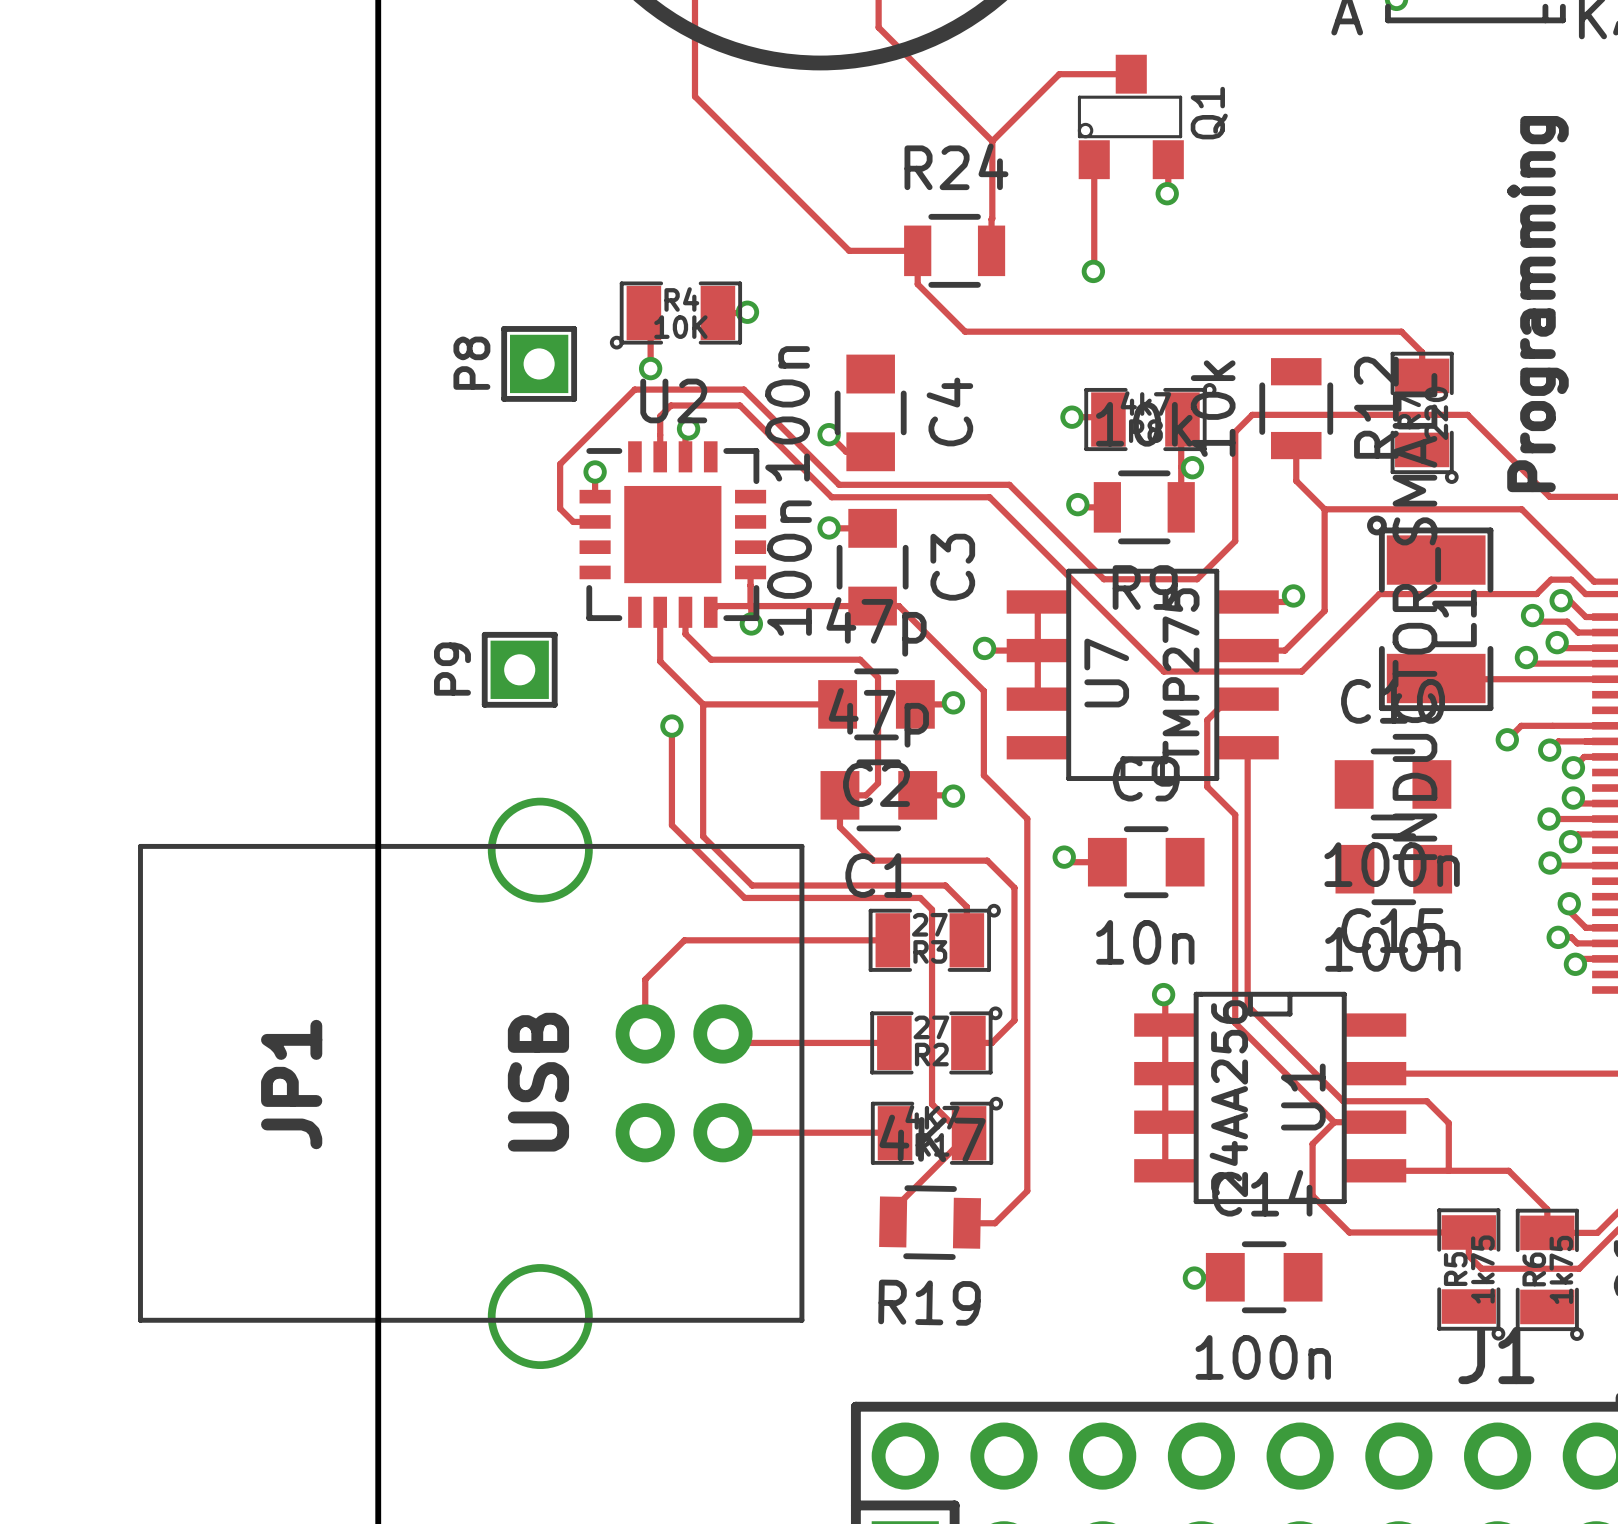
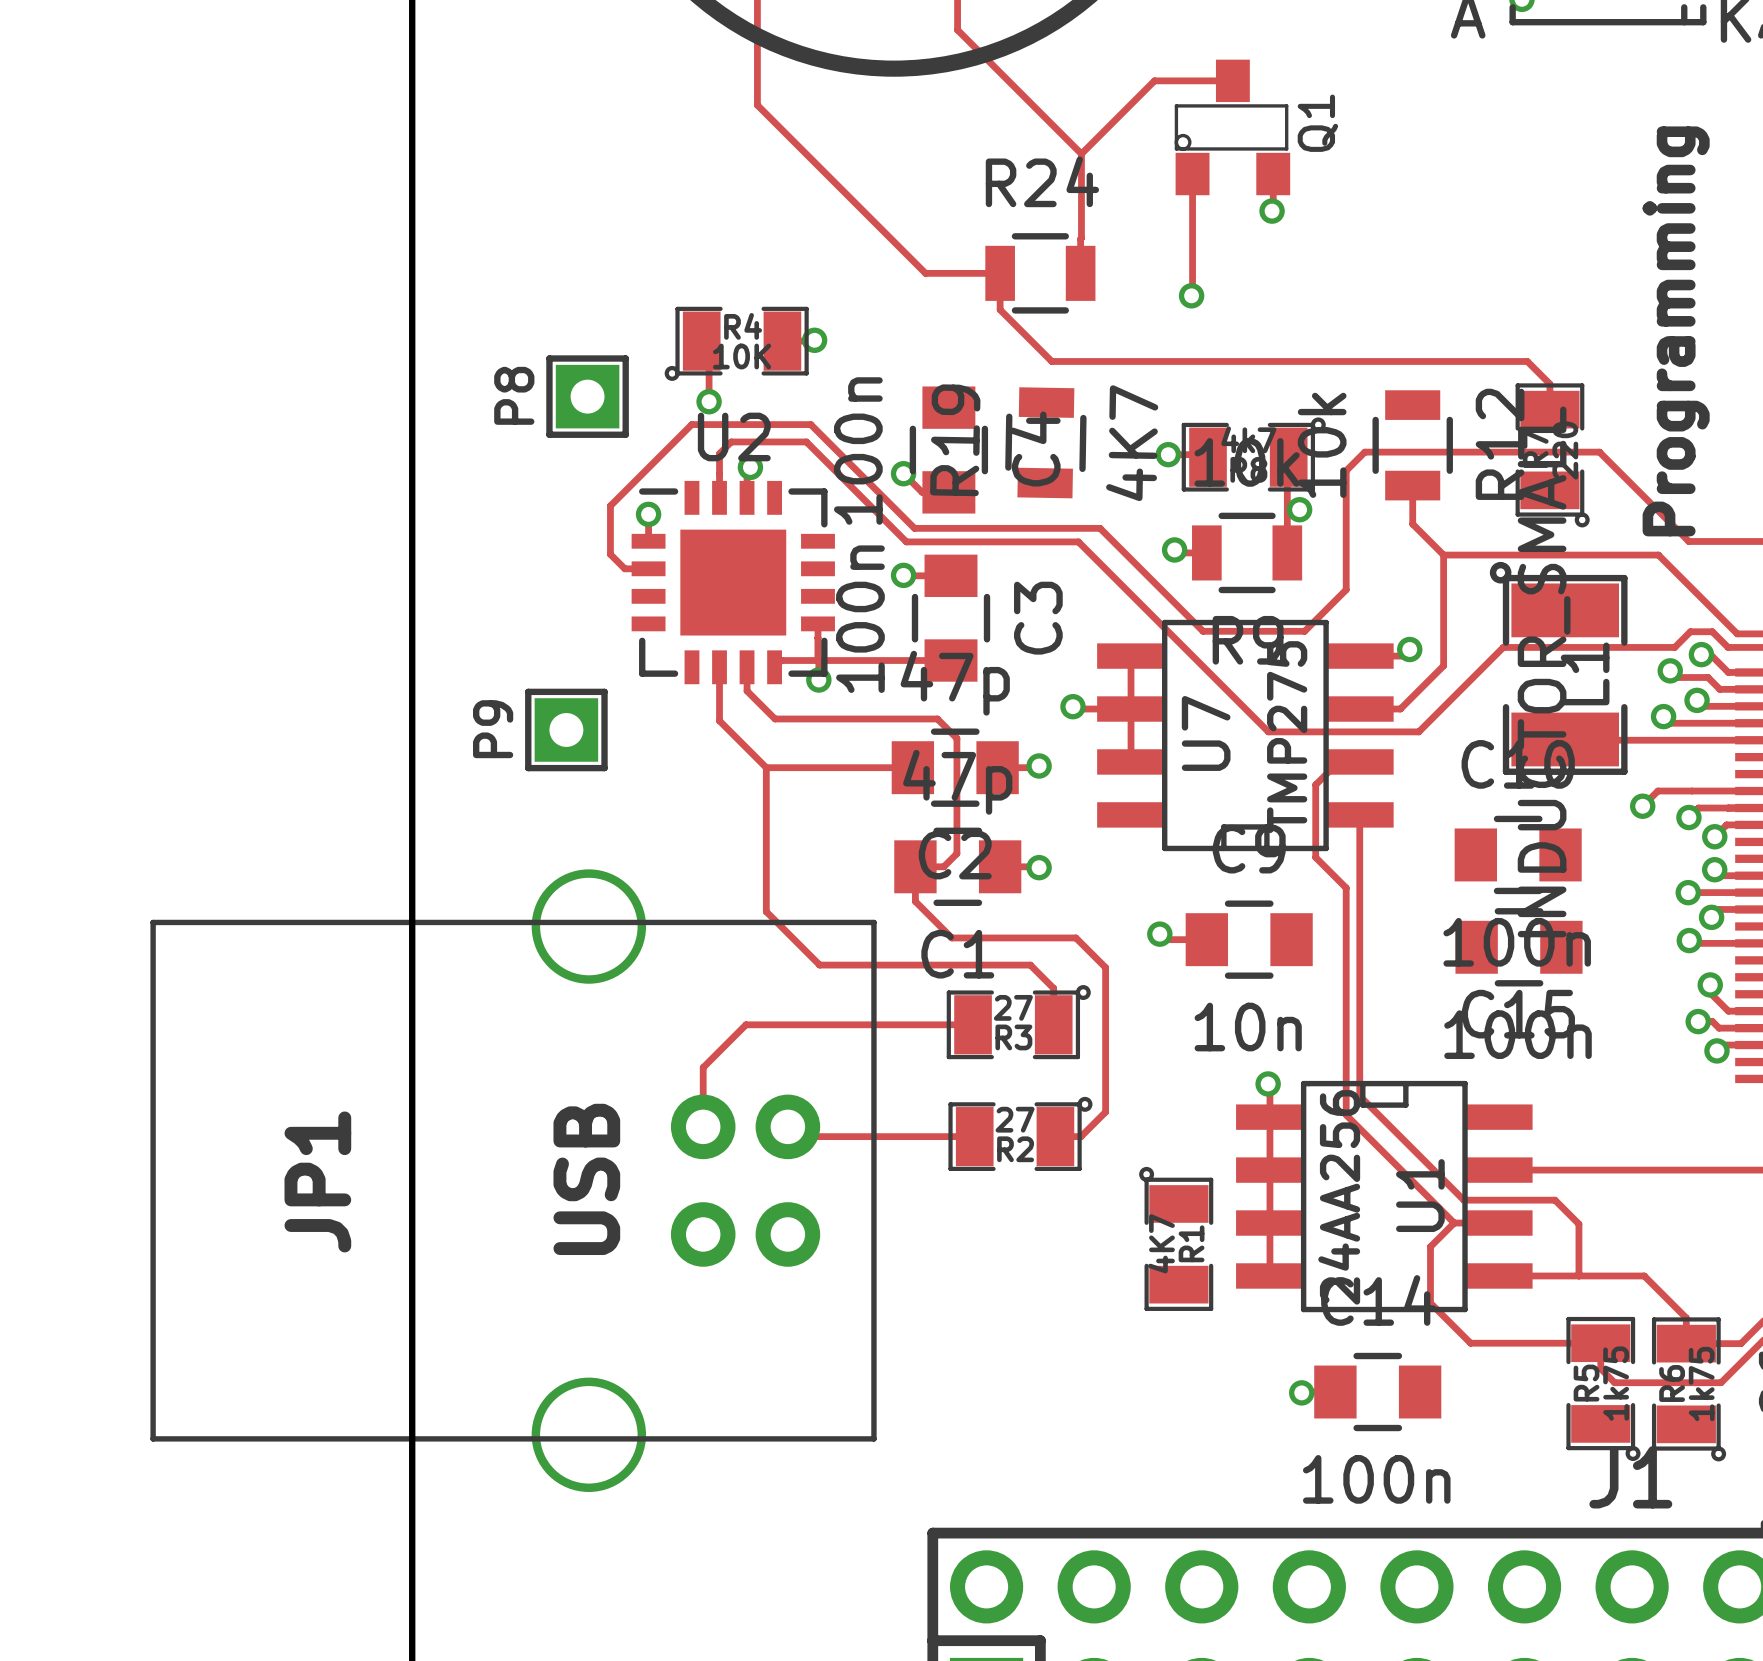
track: (872, 606) (898, 606) (983, 691) (983, 775) (1027, 818) (1027, 1191) (995, 1223) (966, 1223) -> none
track: (671, 726) (671, 825) (744, 897) (920, 897) (932, 909) (932, 1104) (961, 1133) (969, 1133) -> none
via: (671, 726) -> none
R1 rotation: 0° (936, 1130) -> 90° counterclockwise (1176, 1238)
R1 position: (936, 1130) -> (1176, 1238)
track: (722, 1132) (895, 1133) -> none
track: (969, 1133) (893, 1209) (893, 1221) -> none
R19 rotation: 0° (930, 1222) -> 90° clockwise (1045, 442)
R19 position: (930, 1222) -> (1045, 442)

